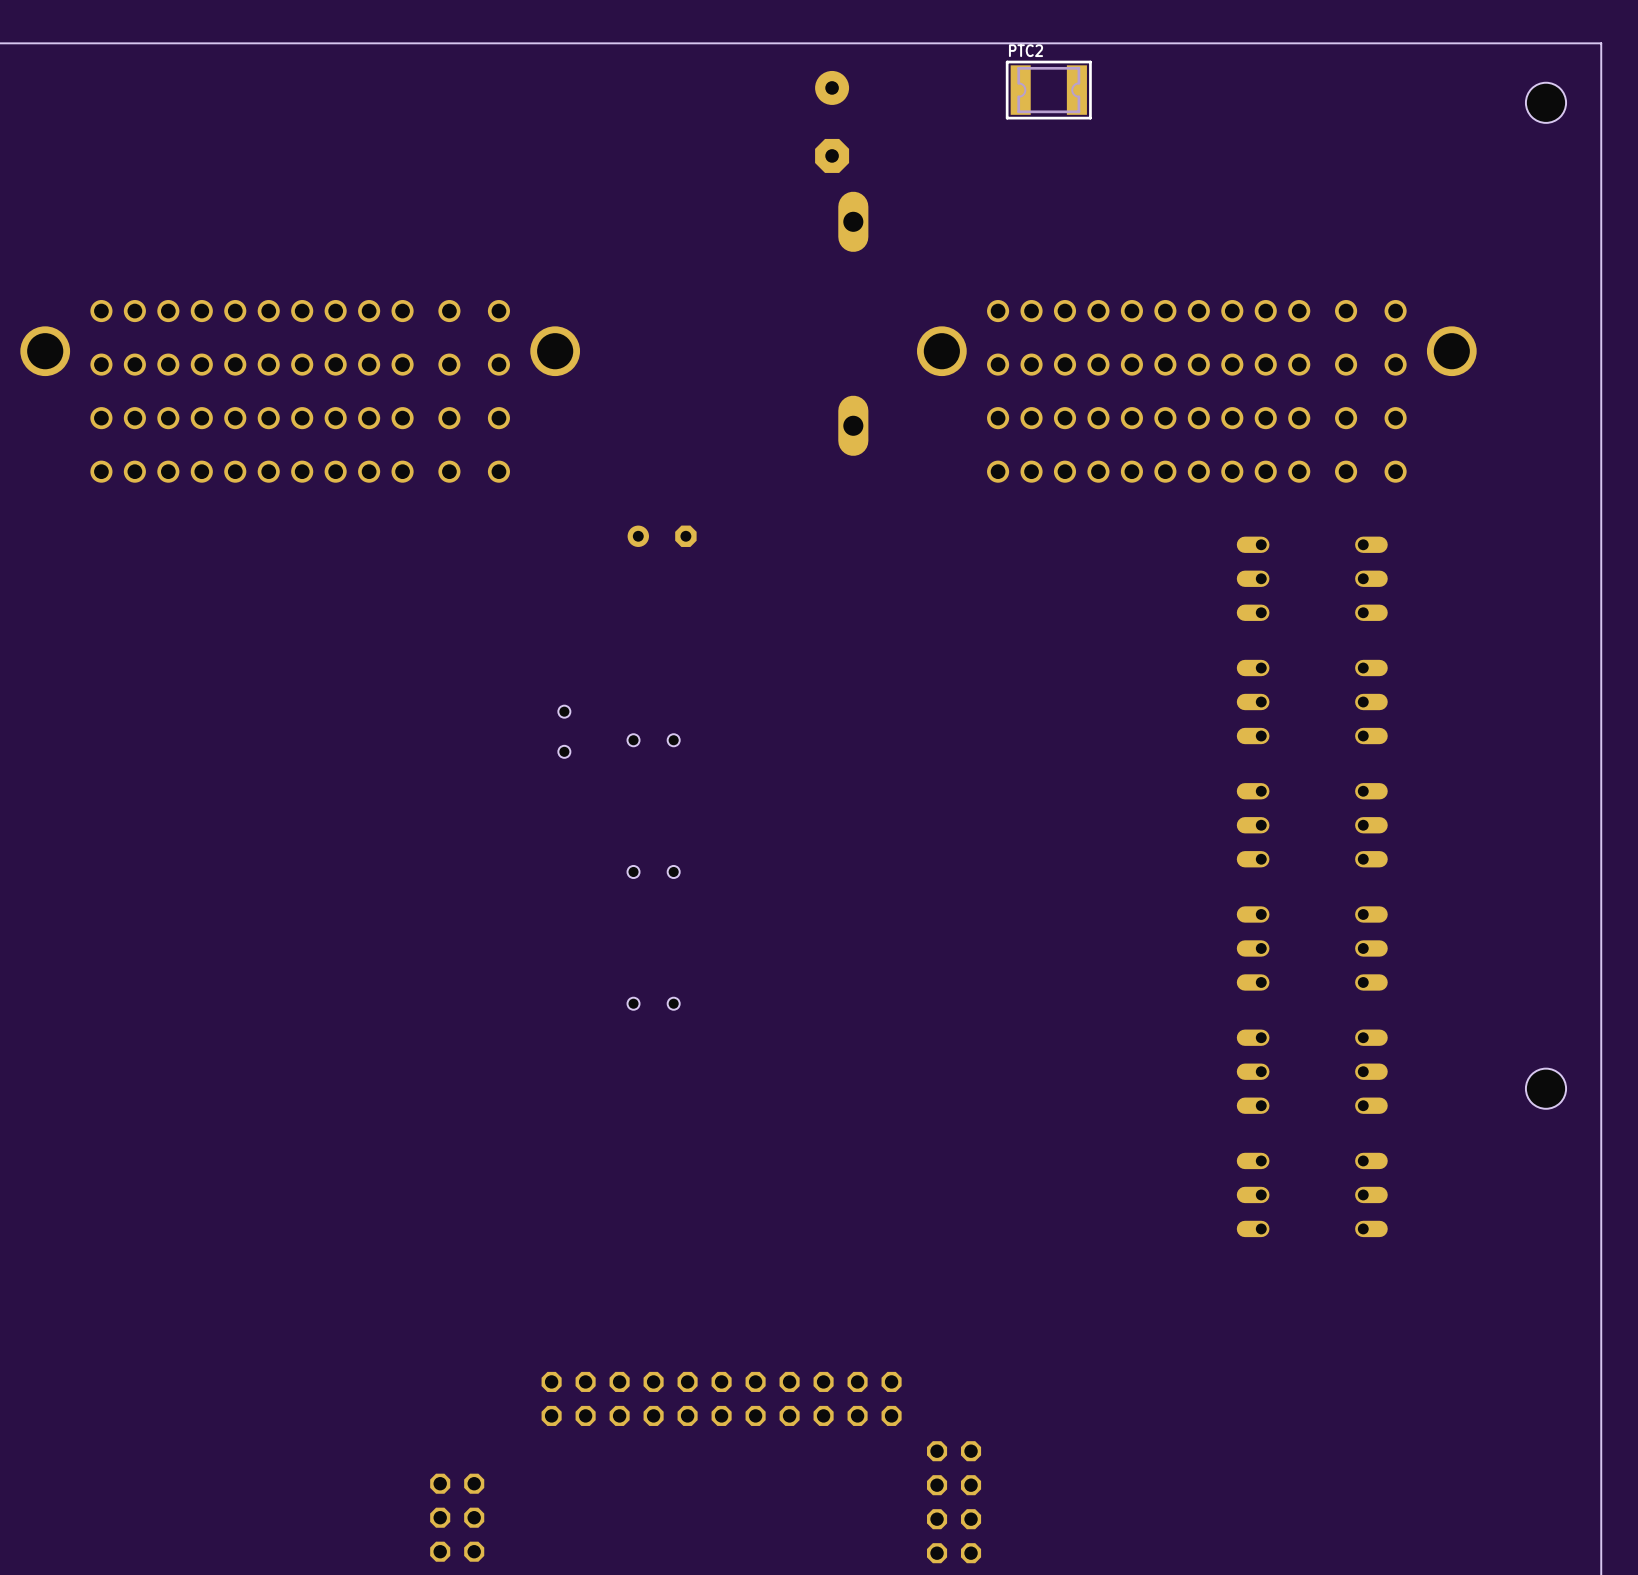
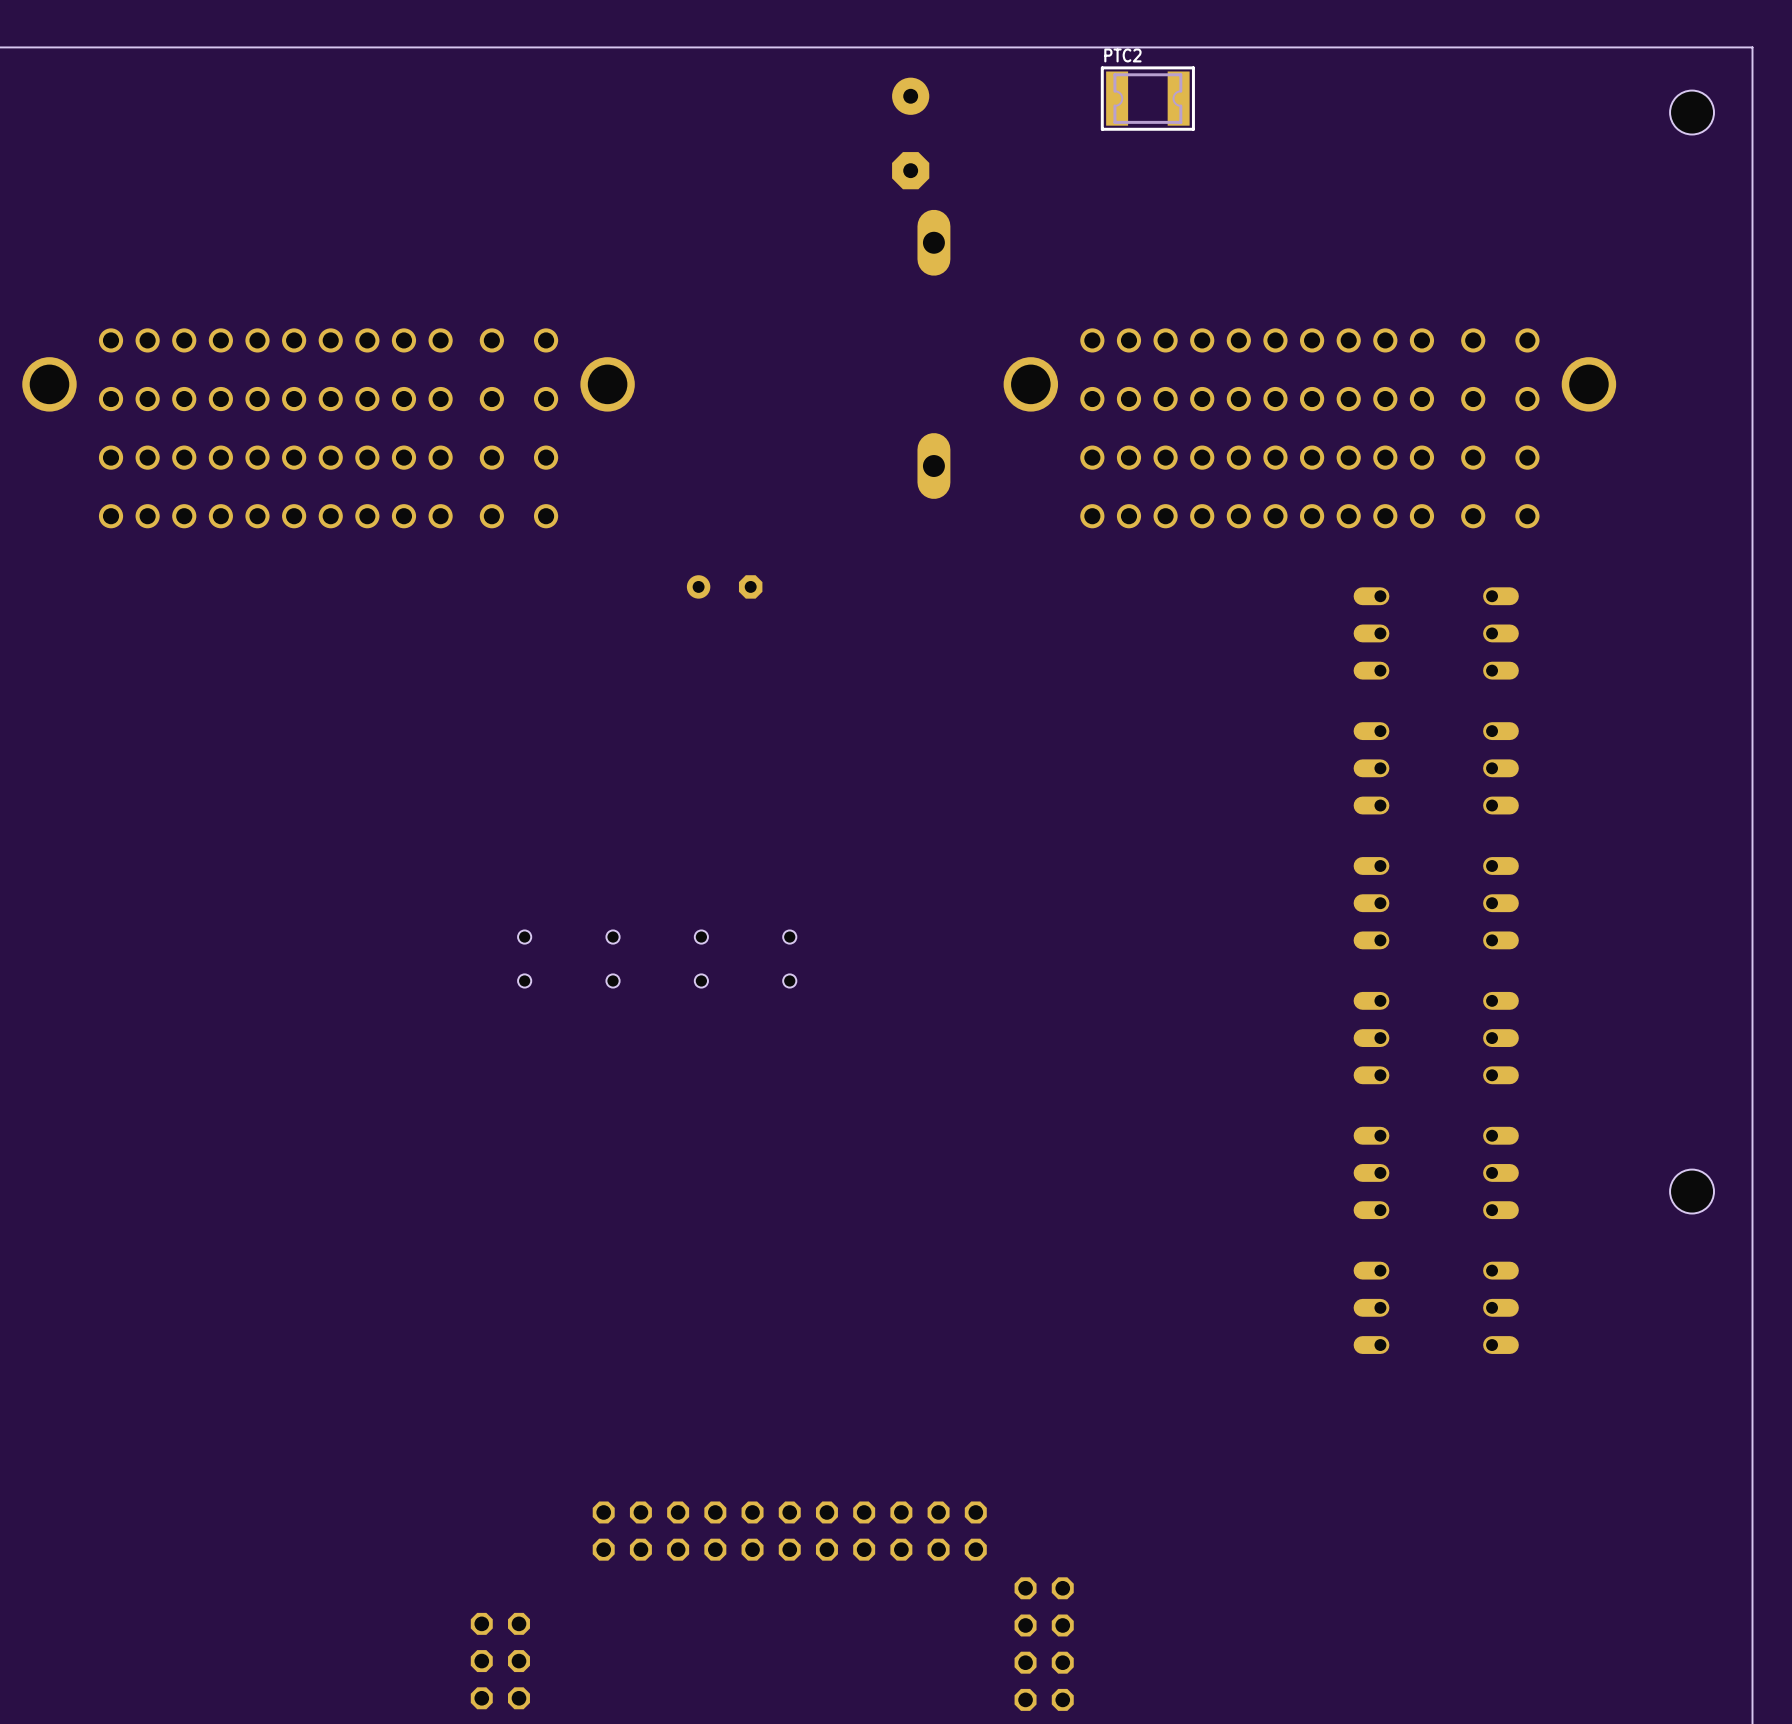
part: (564, 731) -> none
part: (653, 740) -> none
part rotation: 0° (653, 871) -> 90° clockwise (701, 959)
part: none -> (524, 959)
part: none -> (613, 959)
part: none -> (789, 959)
part: (653, 1003) -> none

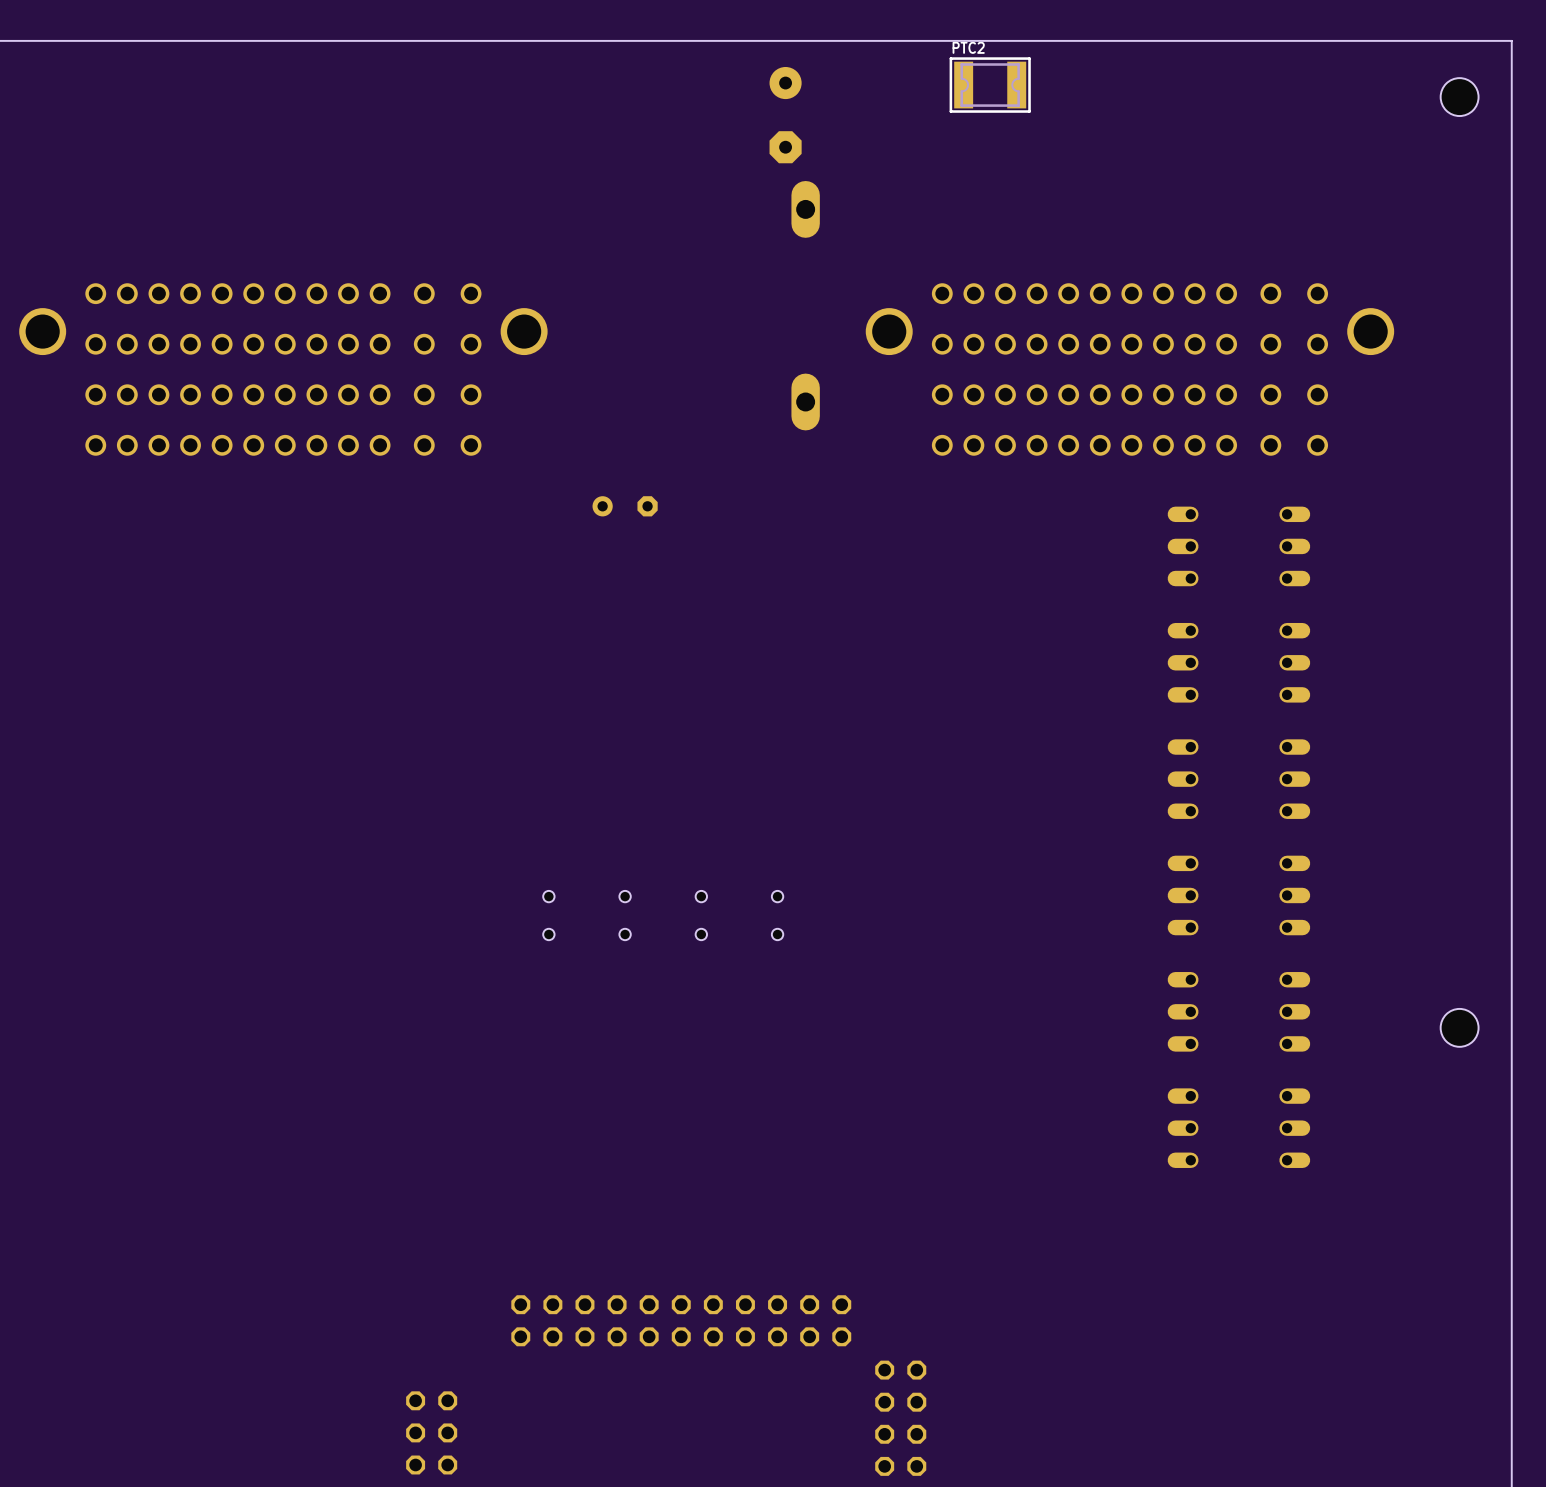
part: (524, 959) -> none
part: (613, 959) -> none
part: (701, 959) -> none
part: (789, 959) -> none
part: none -> (548, 915)
part: none -> (625, 915)
part: none -> (701, 915)
part: none -> (777, 915)

